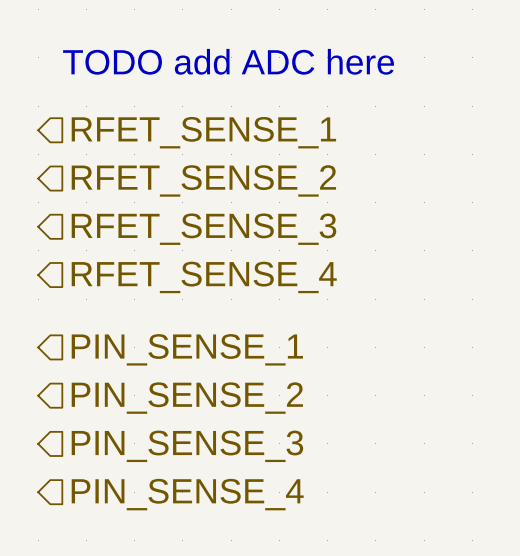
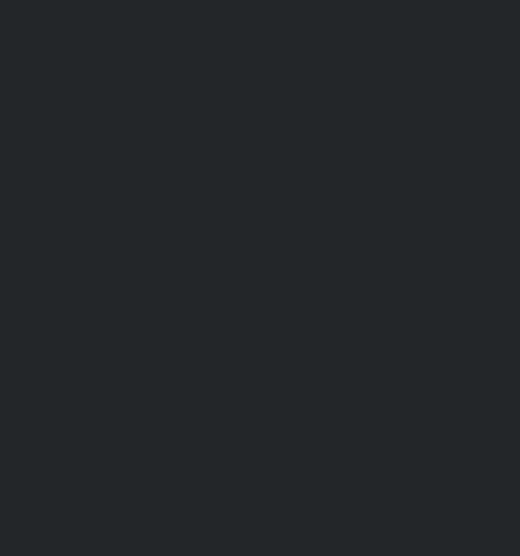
text: TODO add ADC here (228, 61) -> none
hierarchical label: RFET_SENSE_1 (203, 132) -> none
hierarchical label: RFET_SENSE_2 (203, 180) -> none
hierarchical label: RFET_SENSE_3 (203, 229) -> none
hierarchical label: RFET_SENSE_4 (204, 277) -> none
hierarchical label: PIN_SENSE_1 (187, 349) -> none
hierarchical label: PIN_SENSE_2 (187, 398) -> none
hierarchical label: PIN_SENSE_3 (187, 446) -> none
hierarchical label: PIN_SENSE_4 (187, 494) -> none

